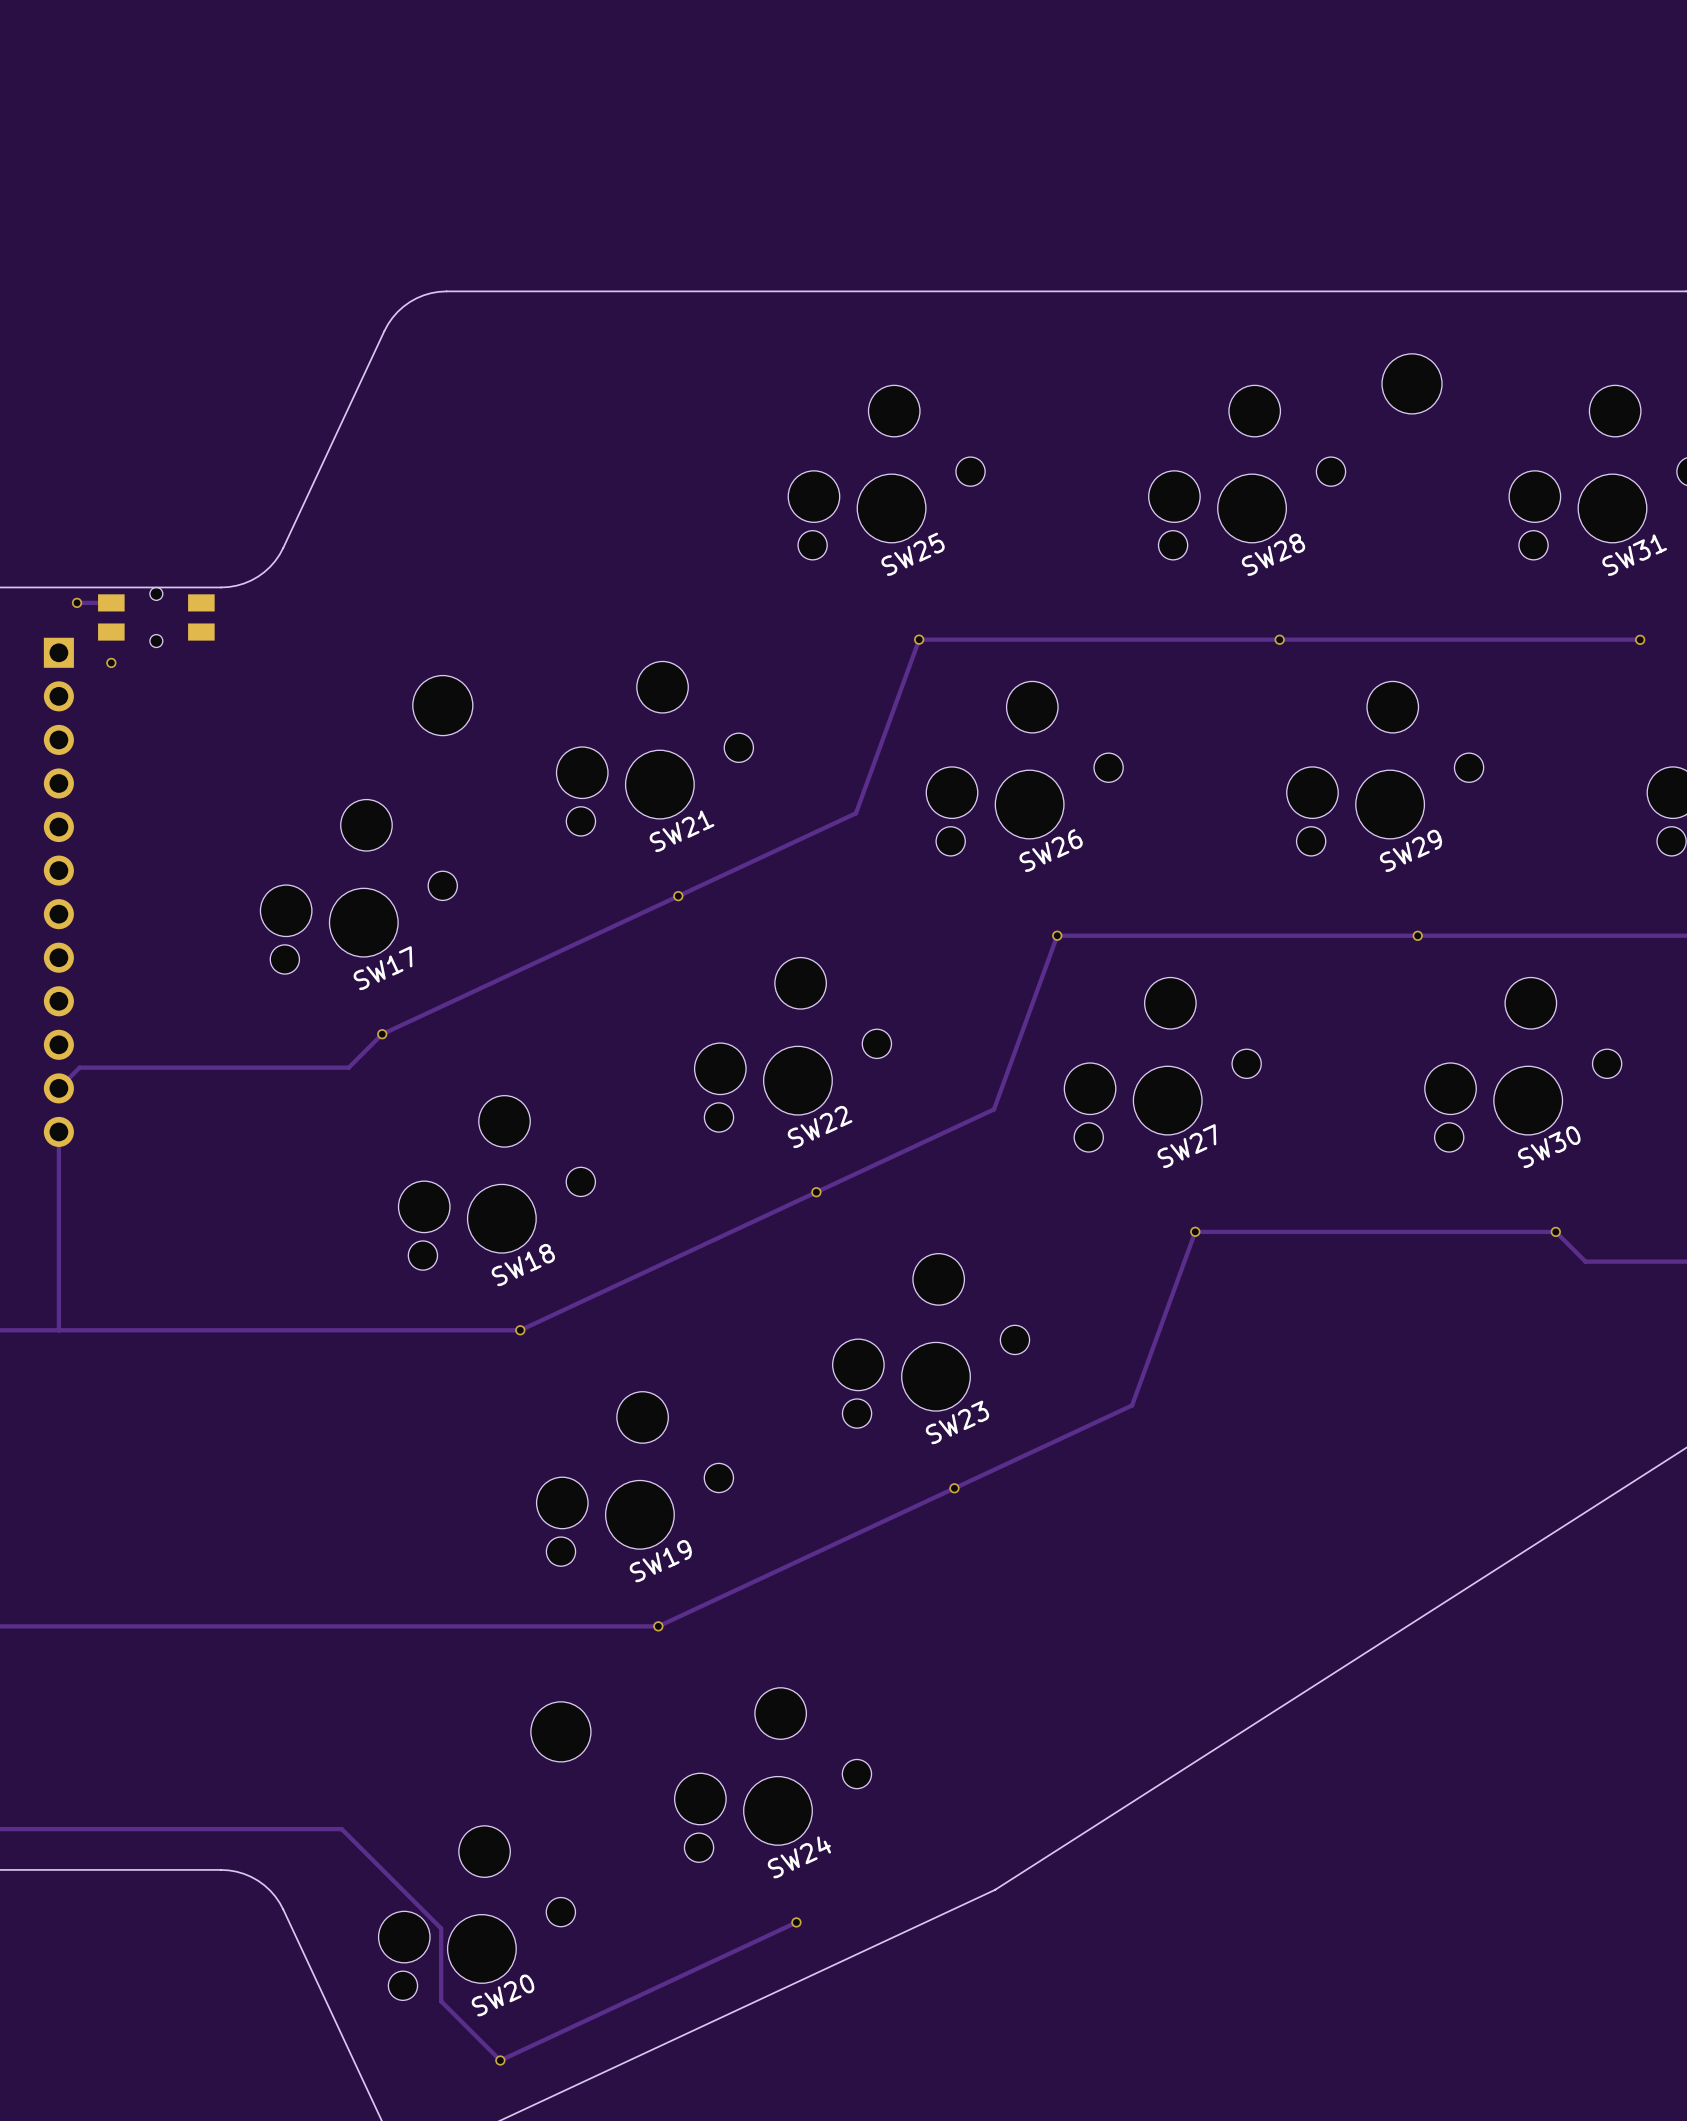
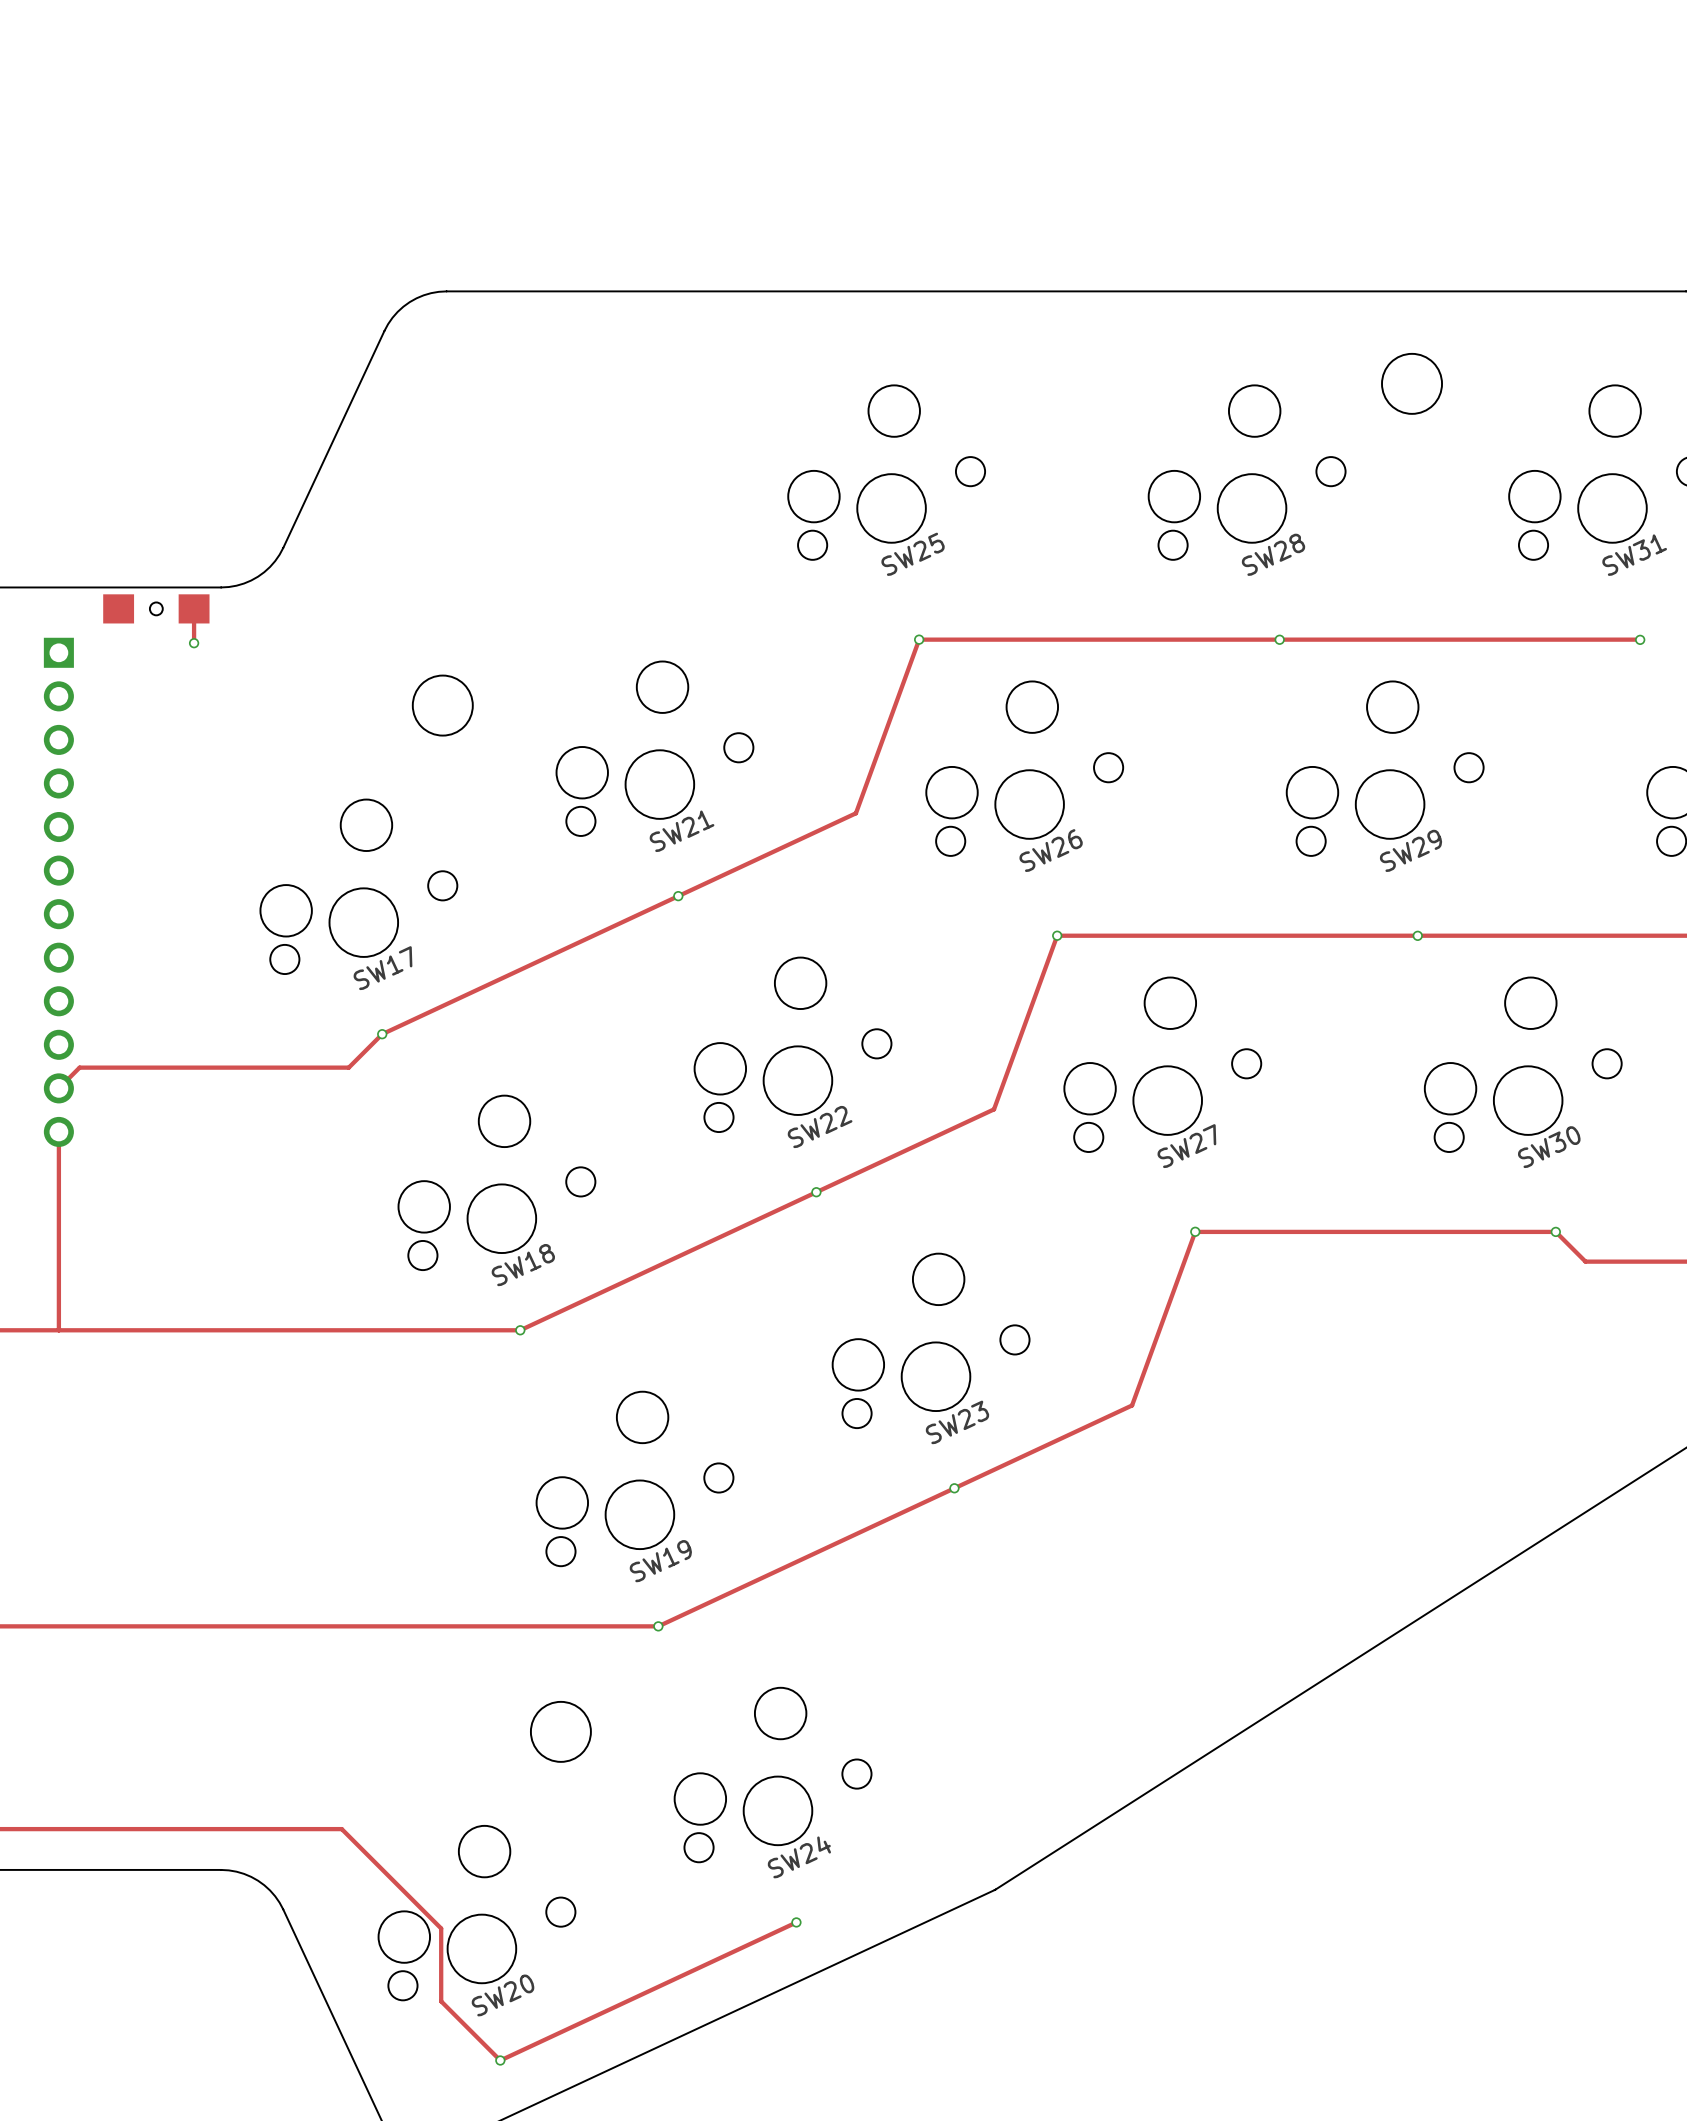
part footprint: [98, 587, 215, 648] -> [103, 594, 210, 624]
track: (77, 602) (111, 602) -> none
via: (77, 602) -> none
track: none -> (194, 608) (194, 643)
via: none -> (194, 643)
via: (111, 662) -> none

